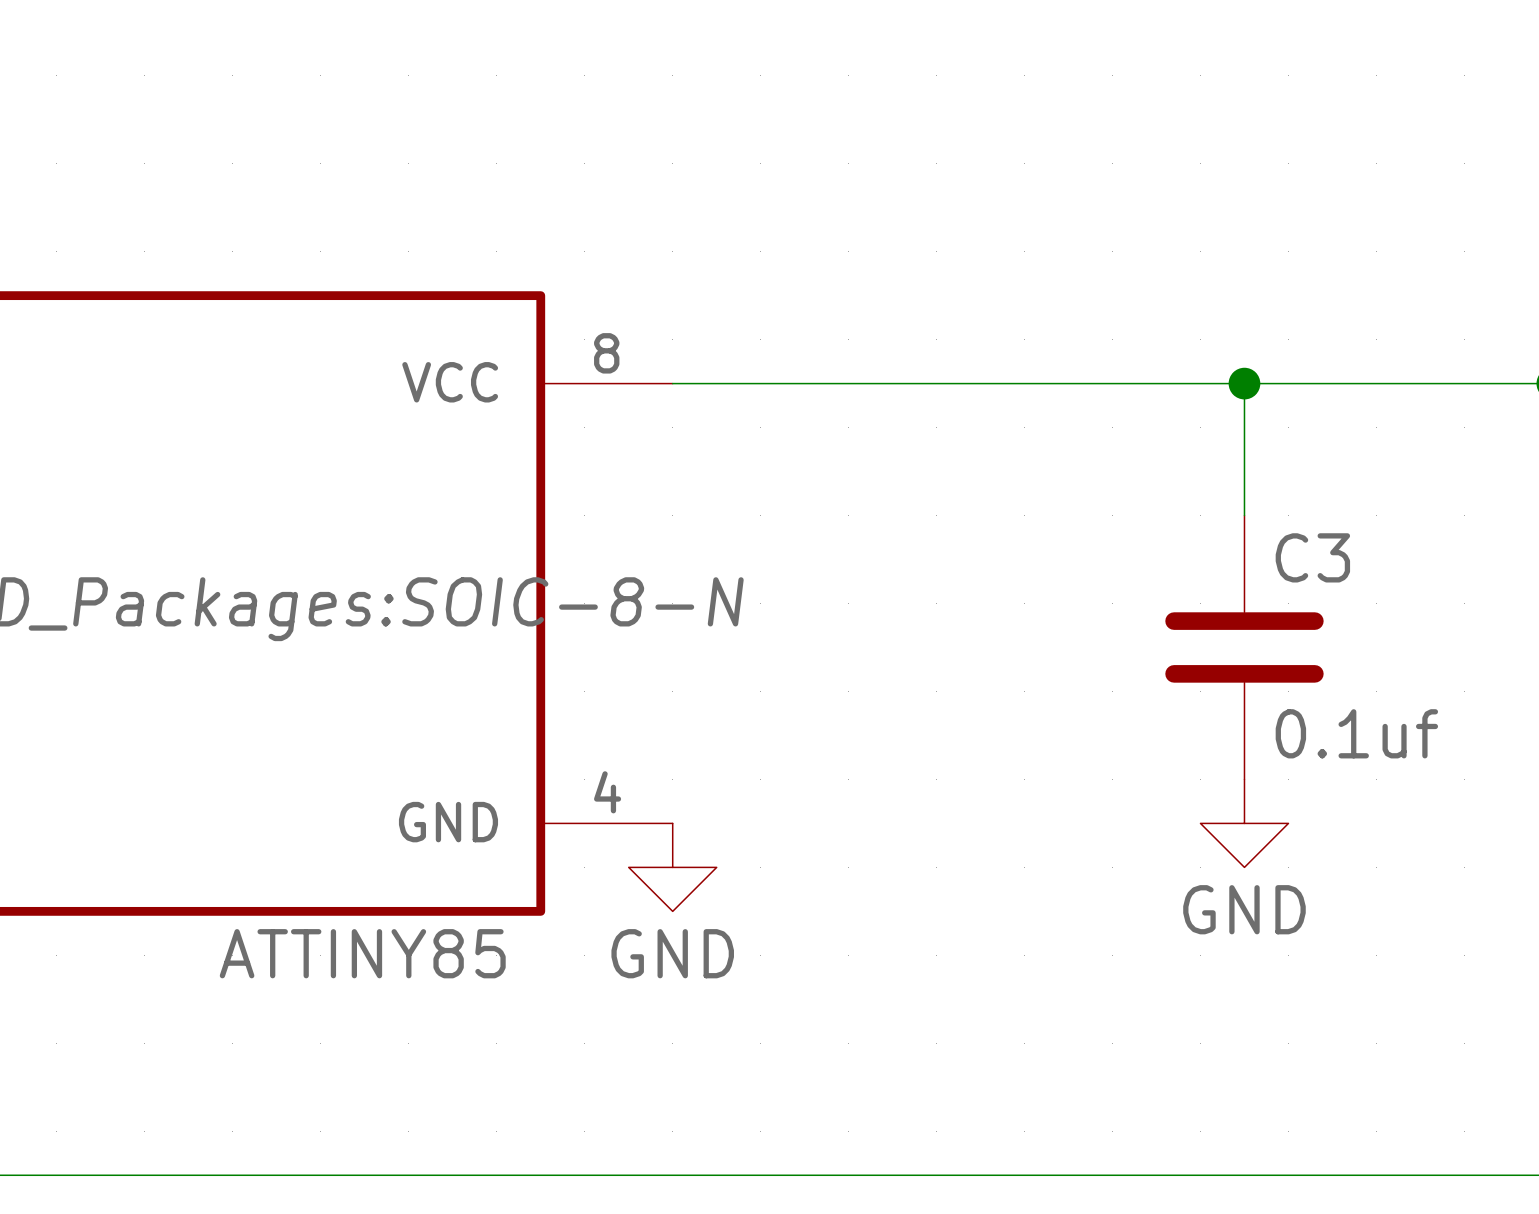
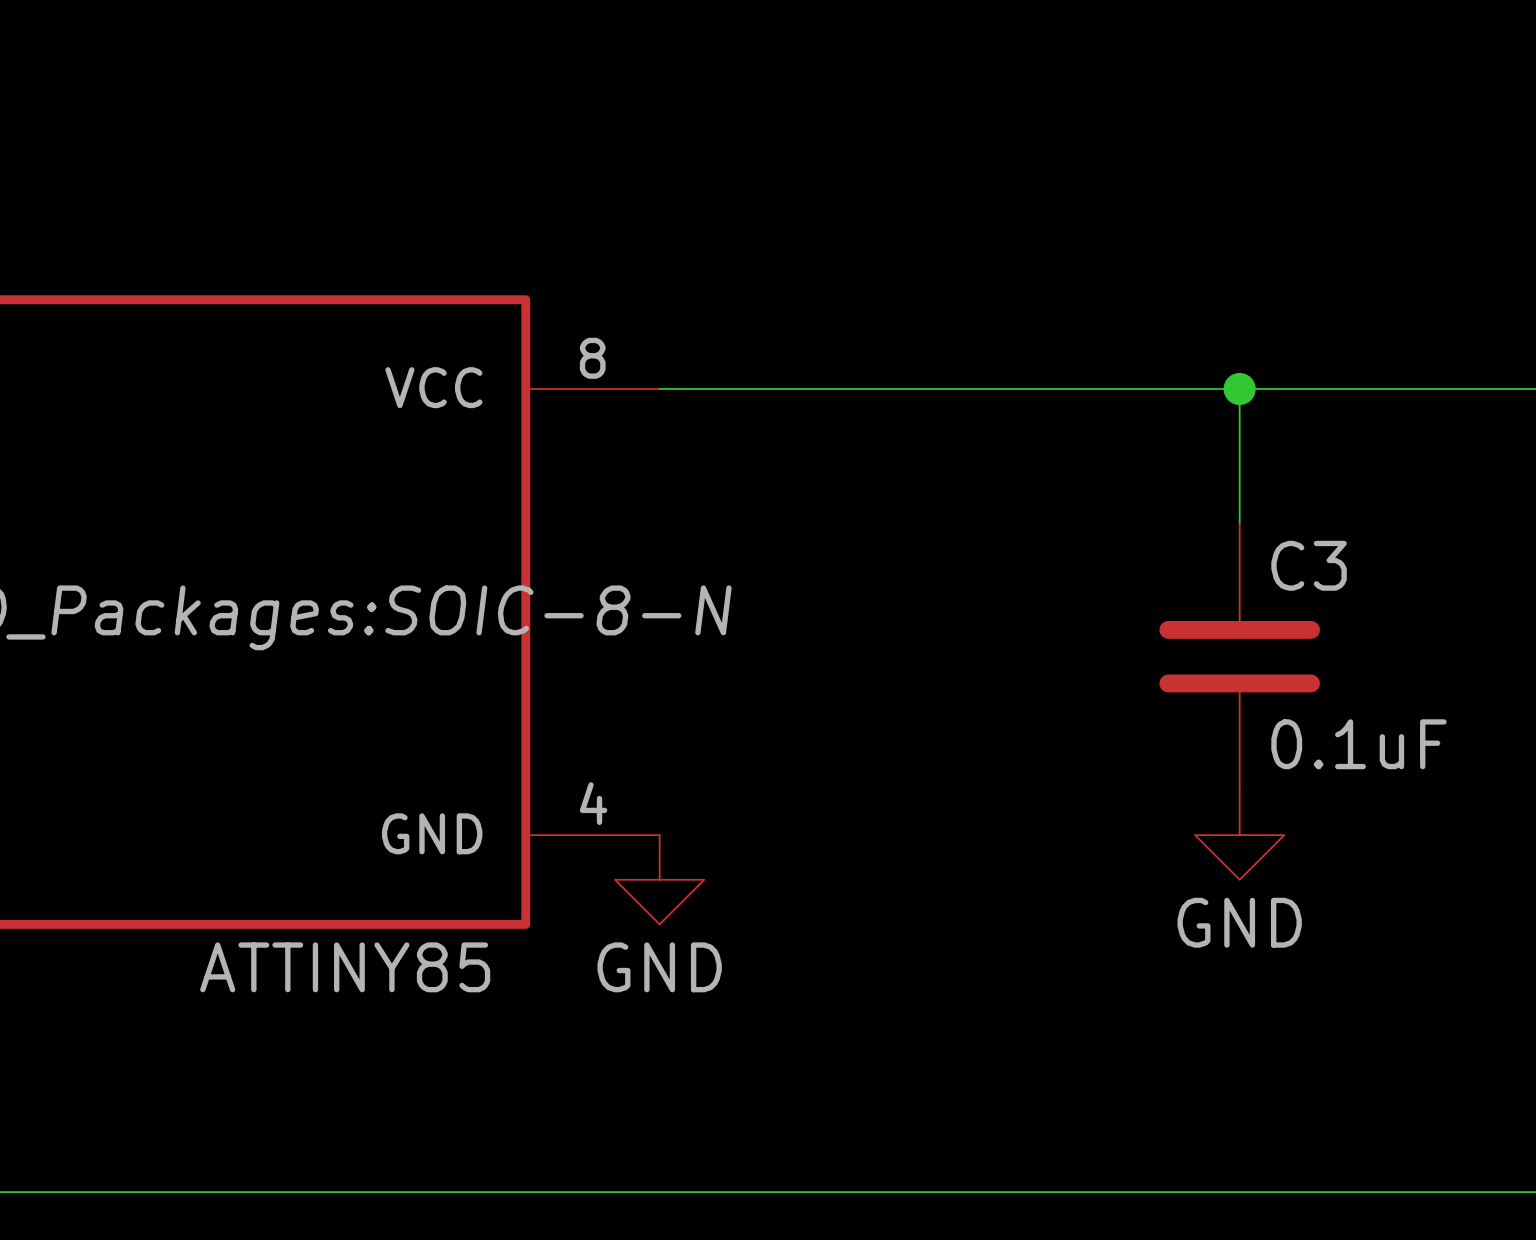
C3 value: 0.1uf (1356, 733) -> 0.1uF (1358, 744)

